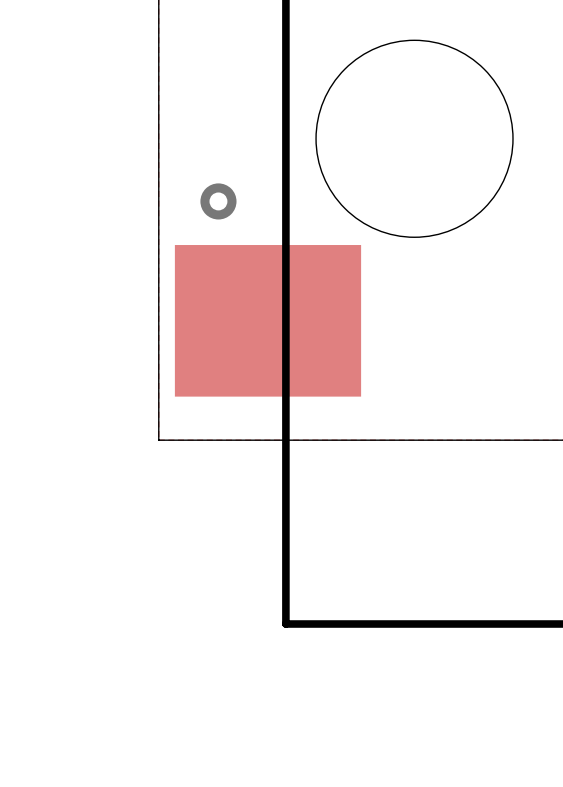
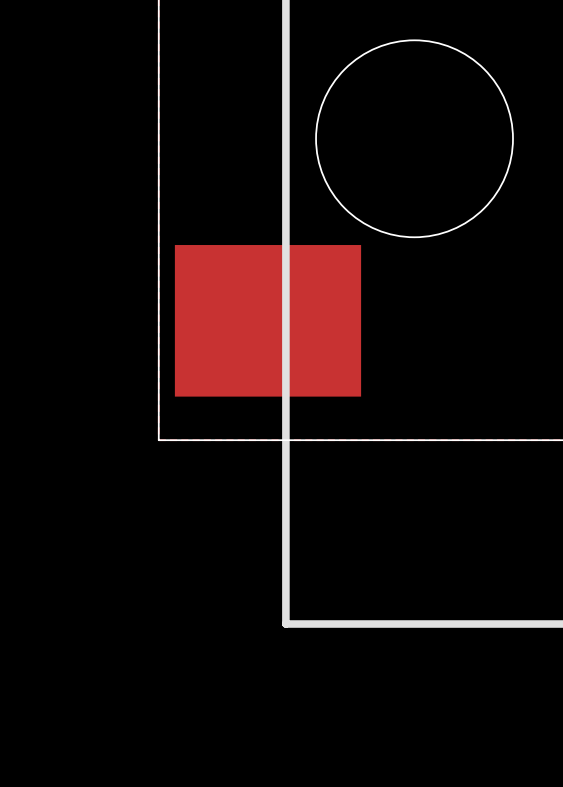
via: (218, 201) -> none

